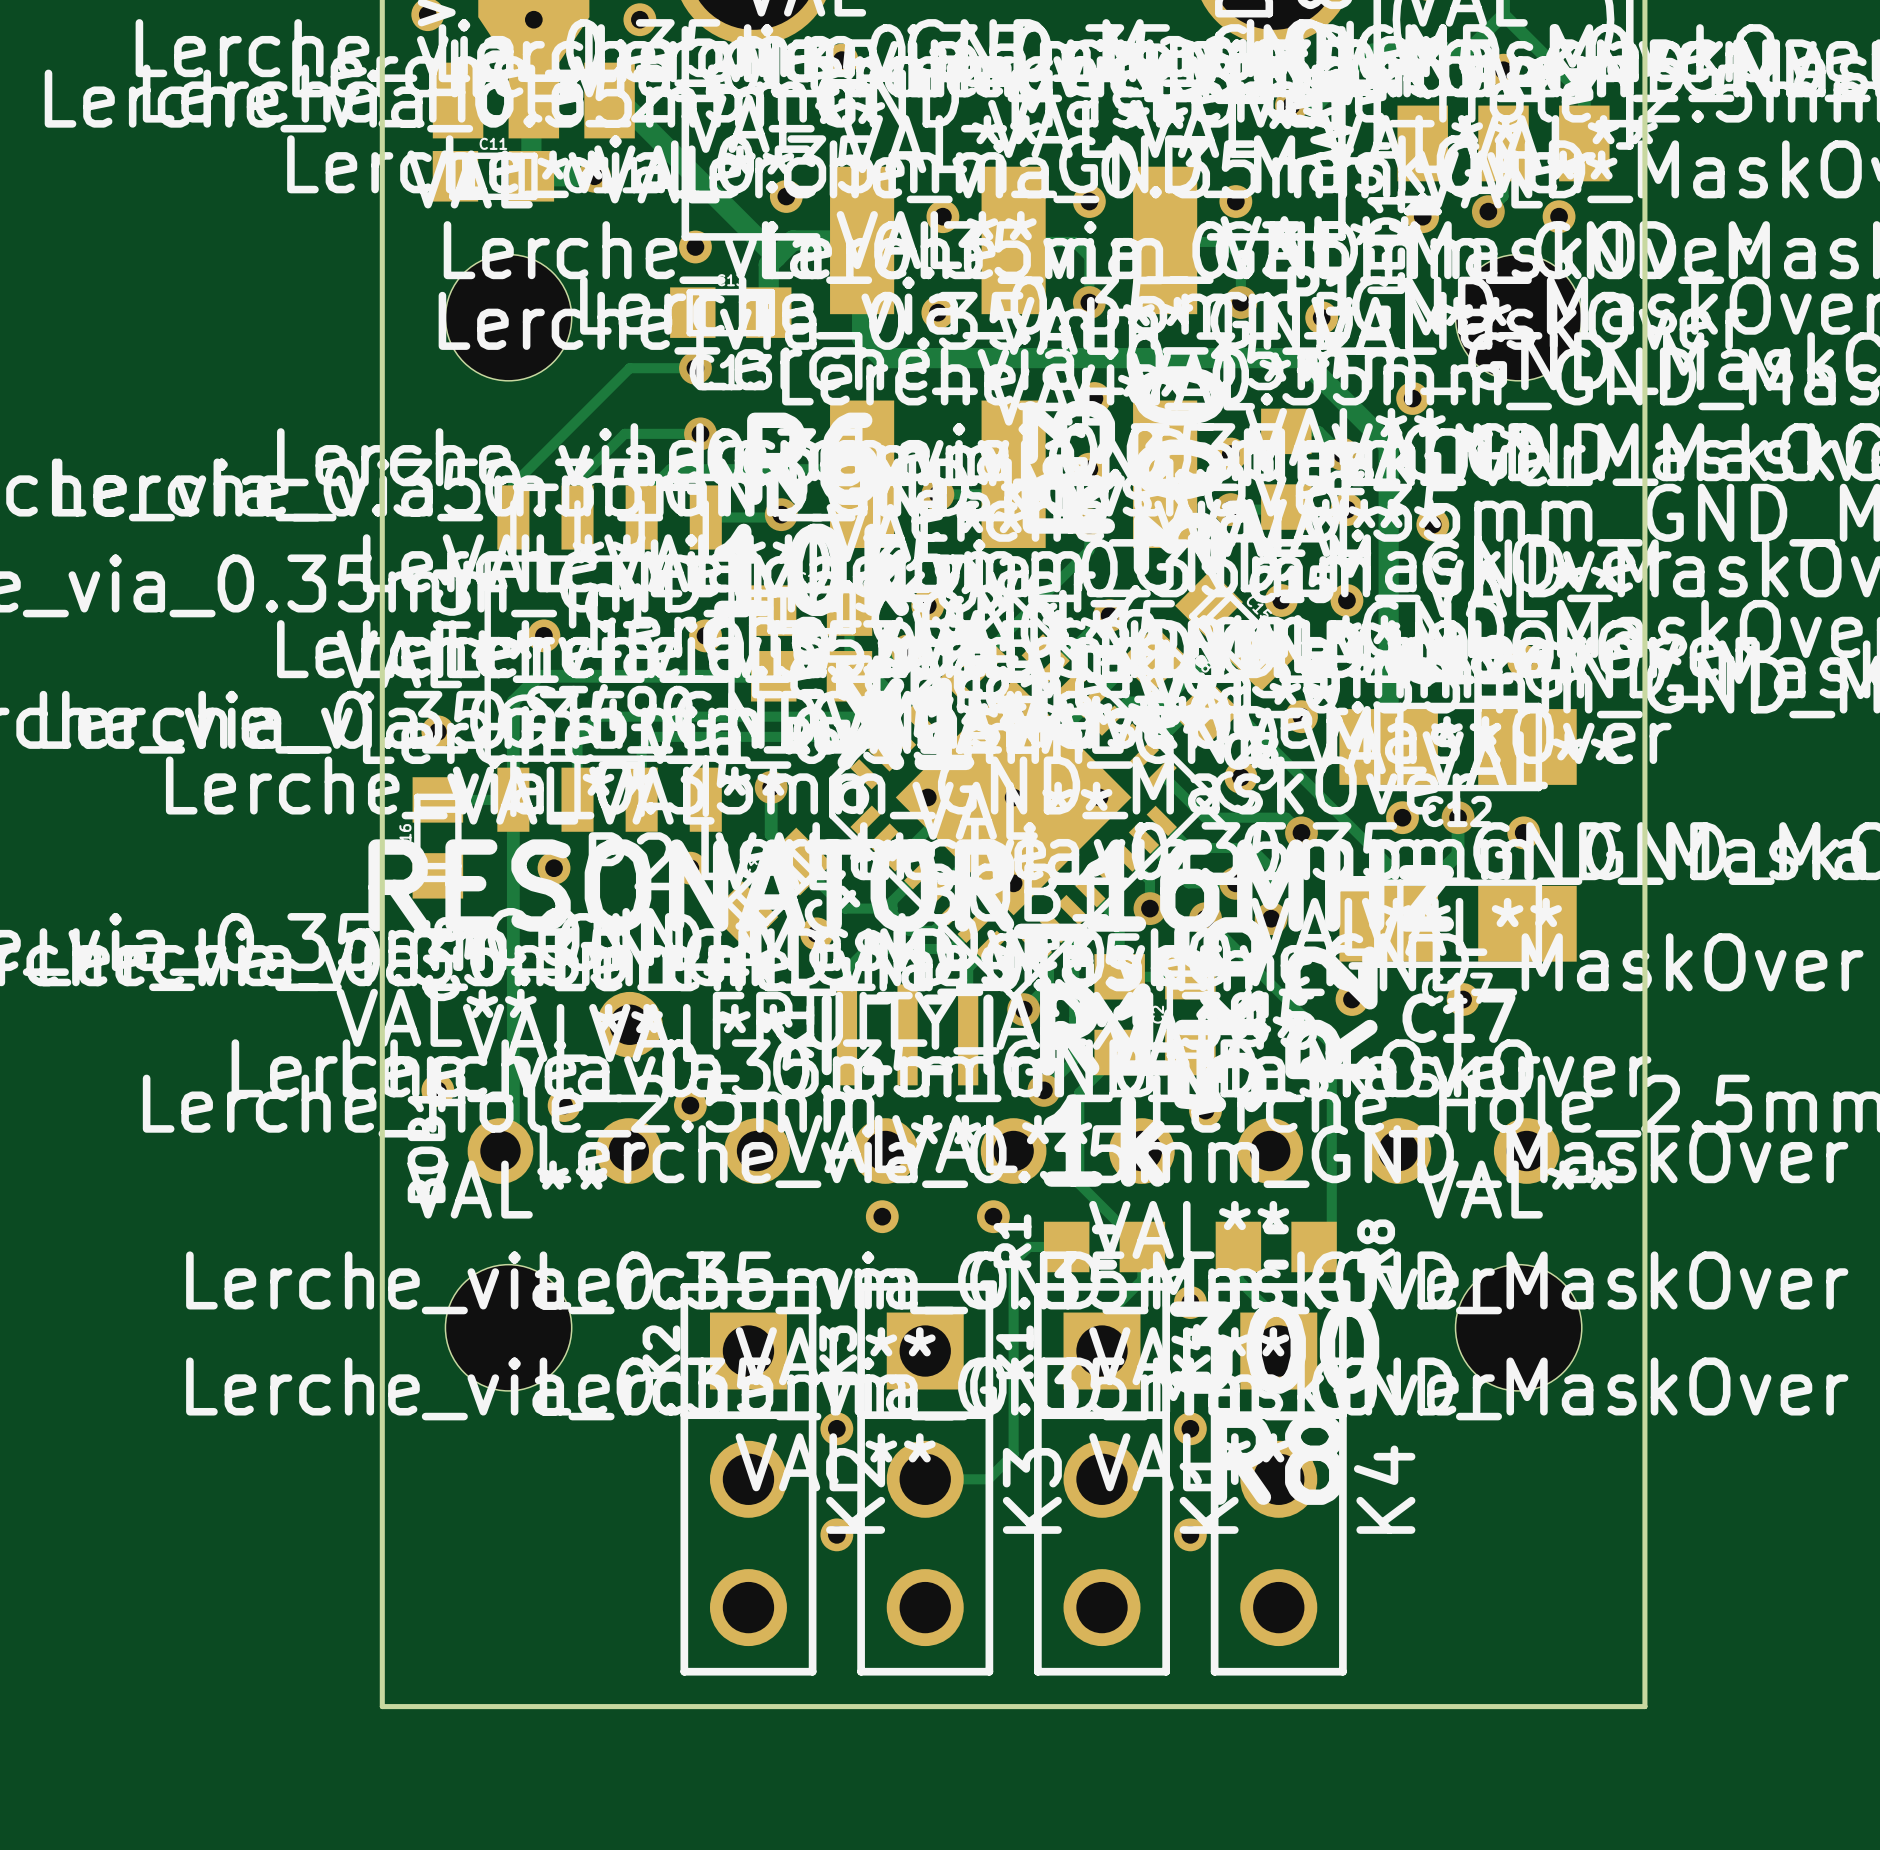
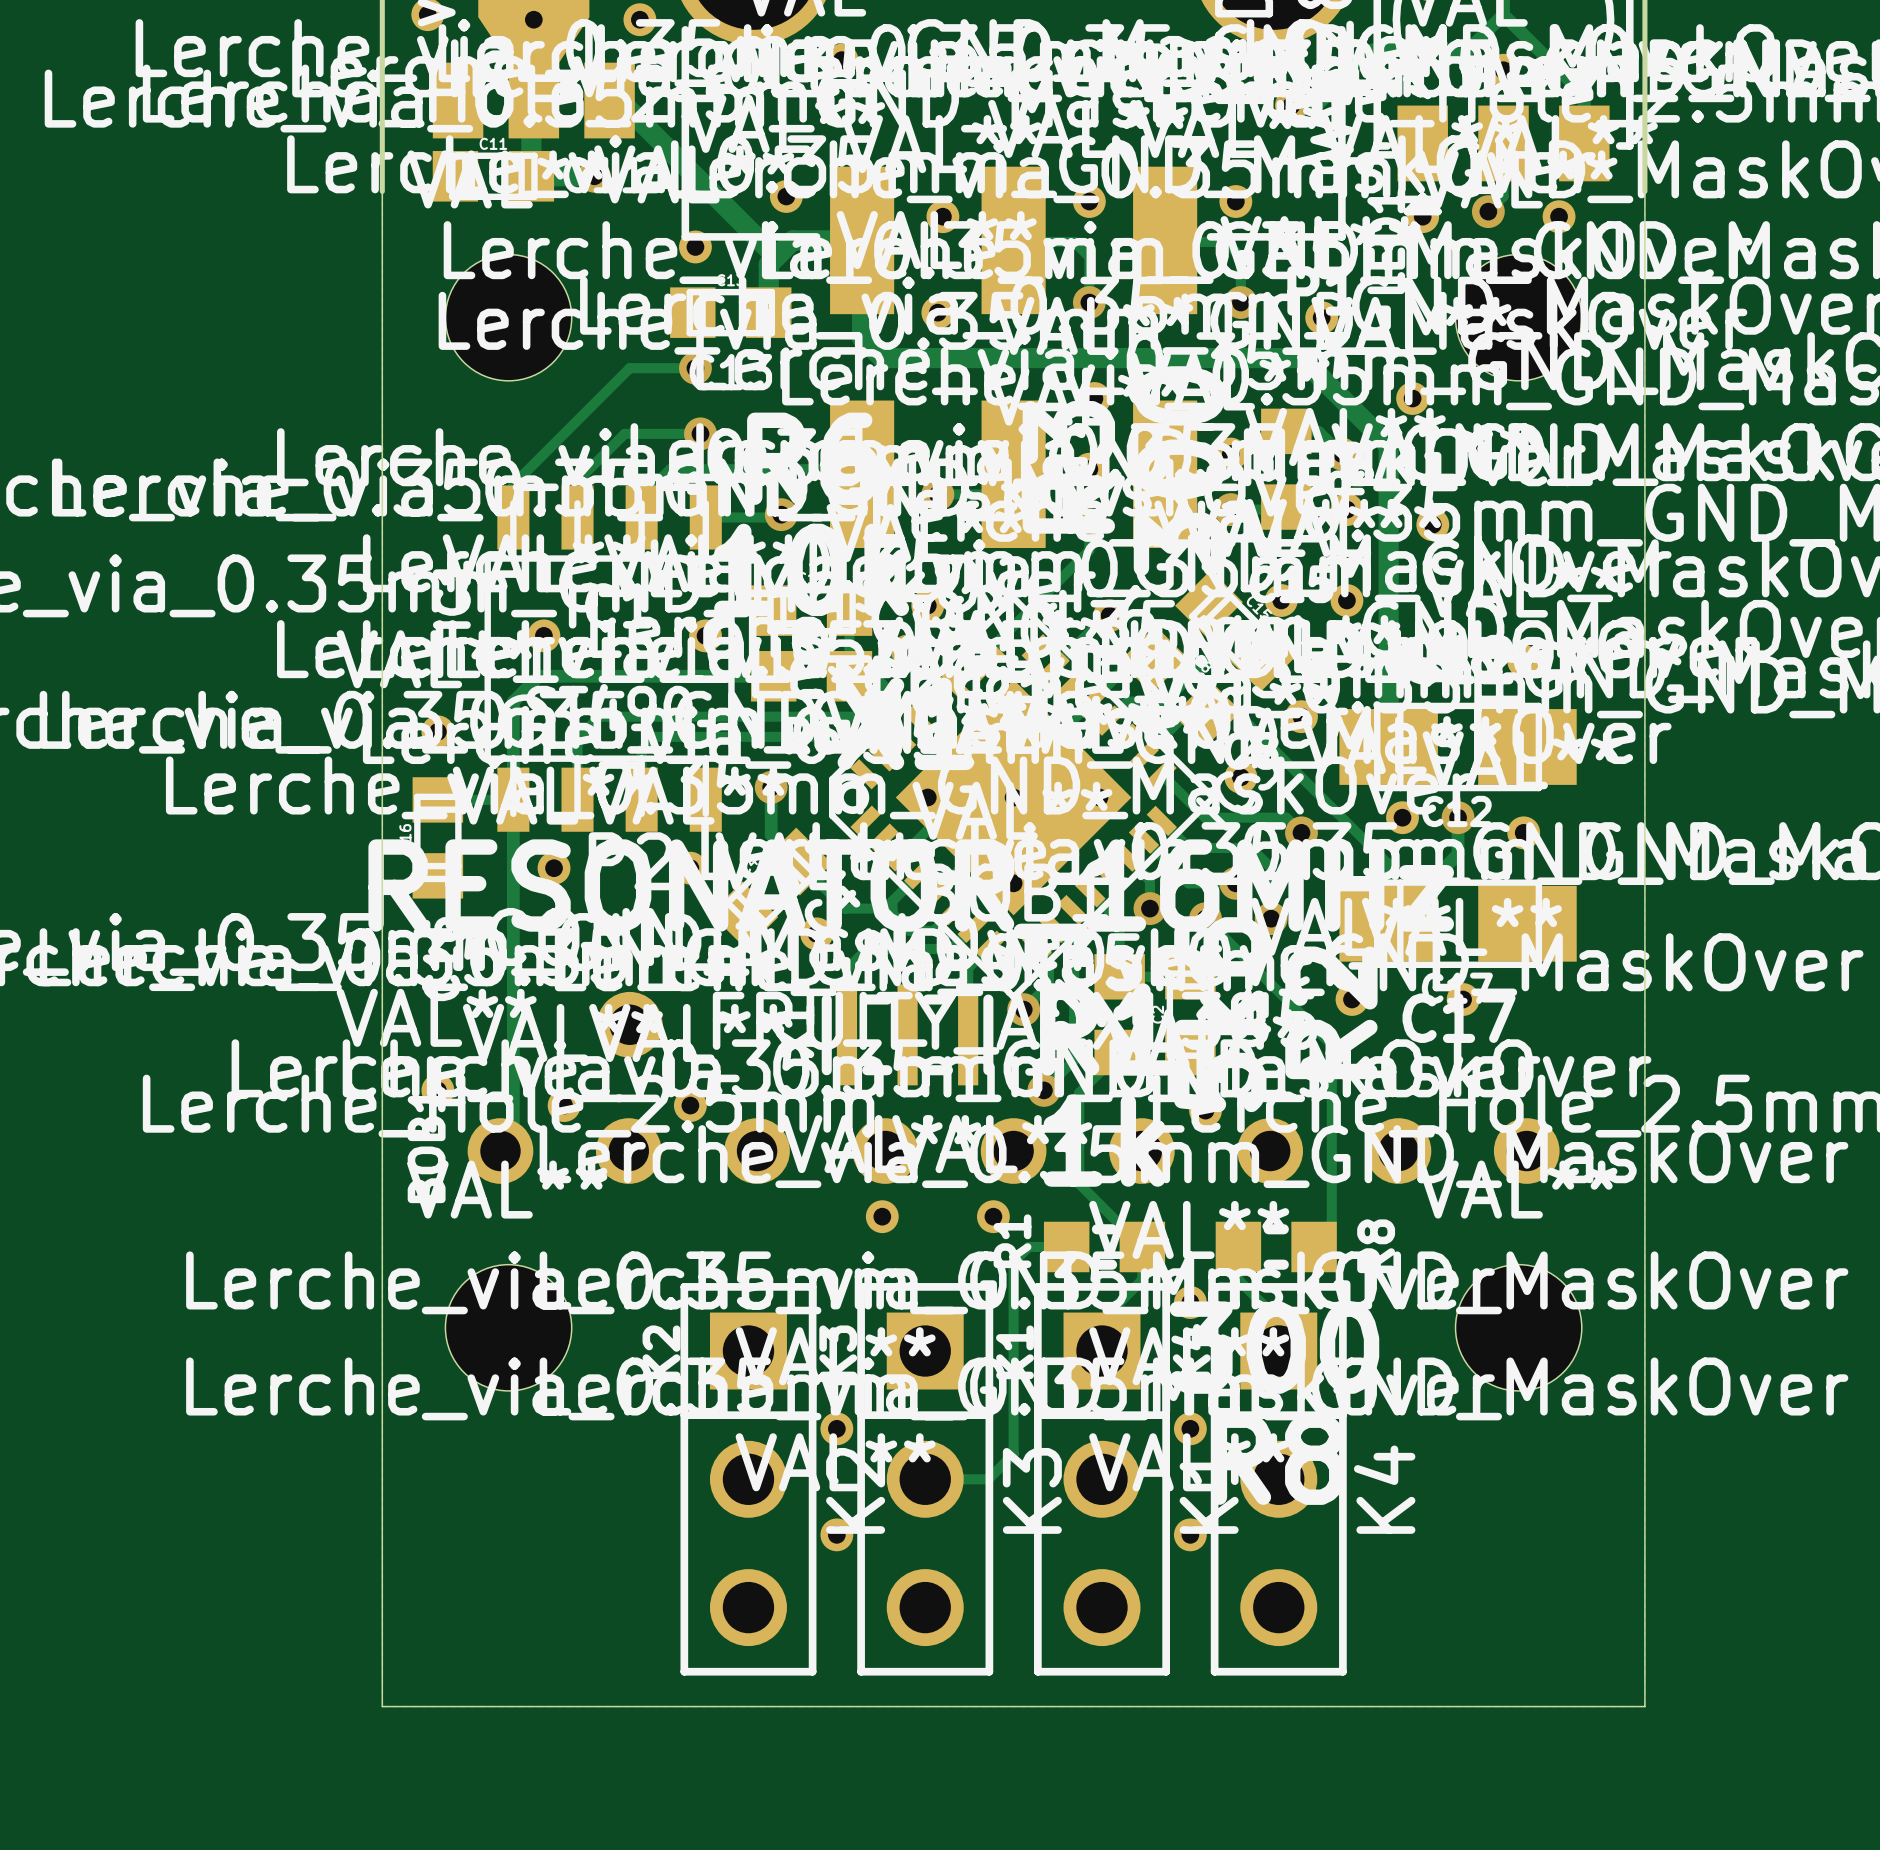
board edge width: thick (382, 191) (382, 1706) (1644, 1706) (1644, 191) -> thin (382, 191) (382, 1706) (1644, 1706) (1644, 191)

